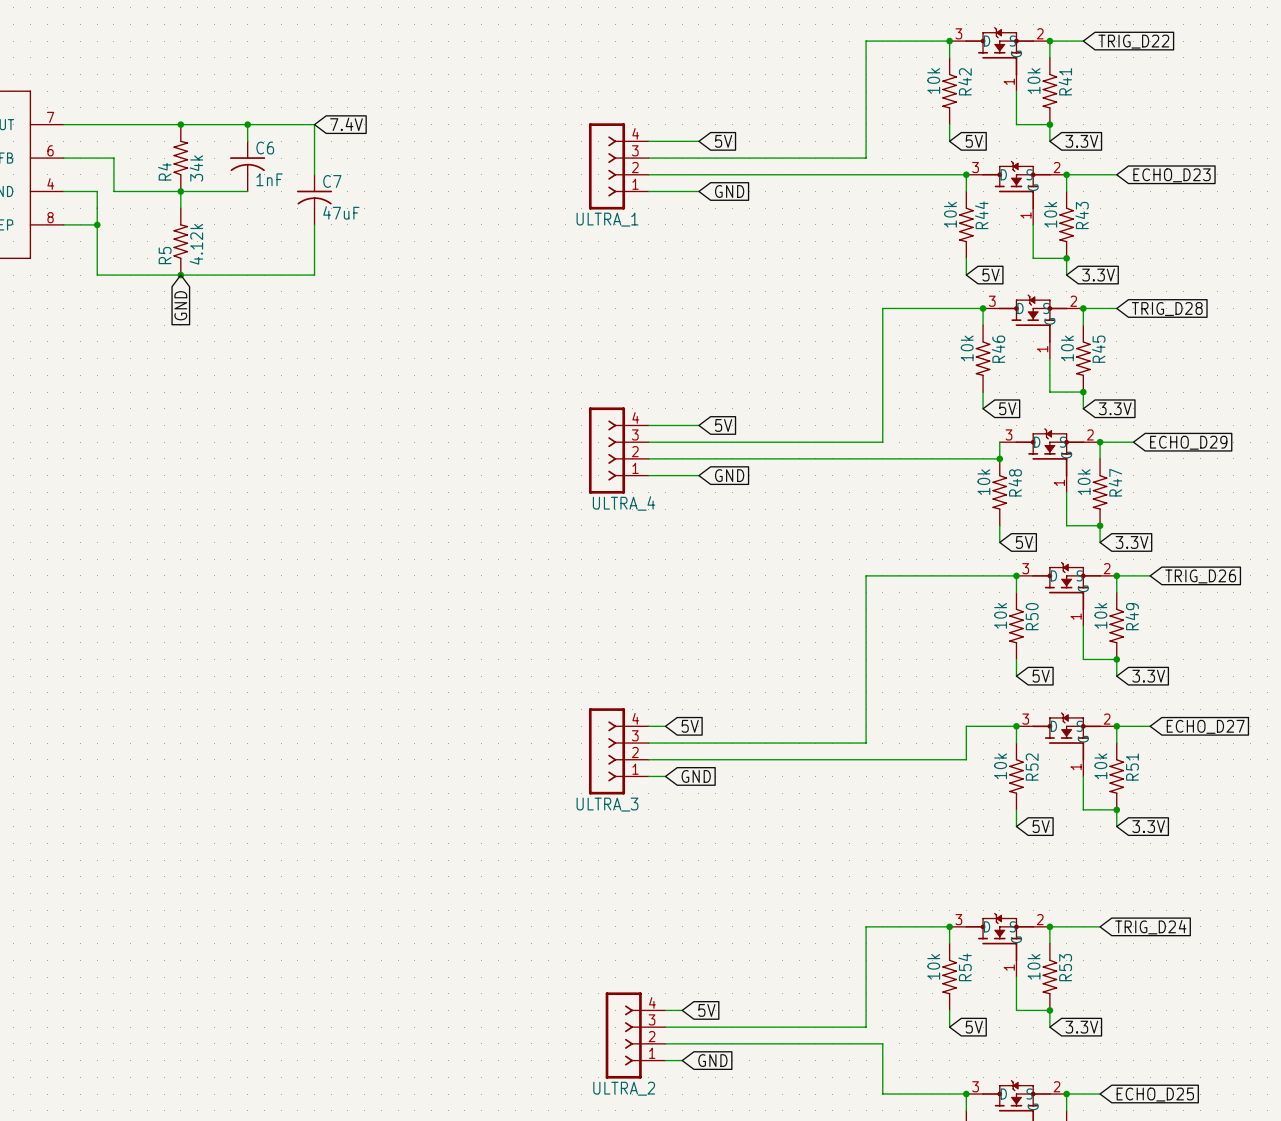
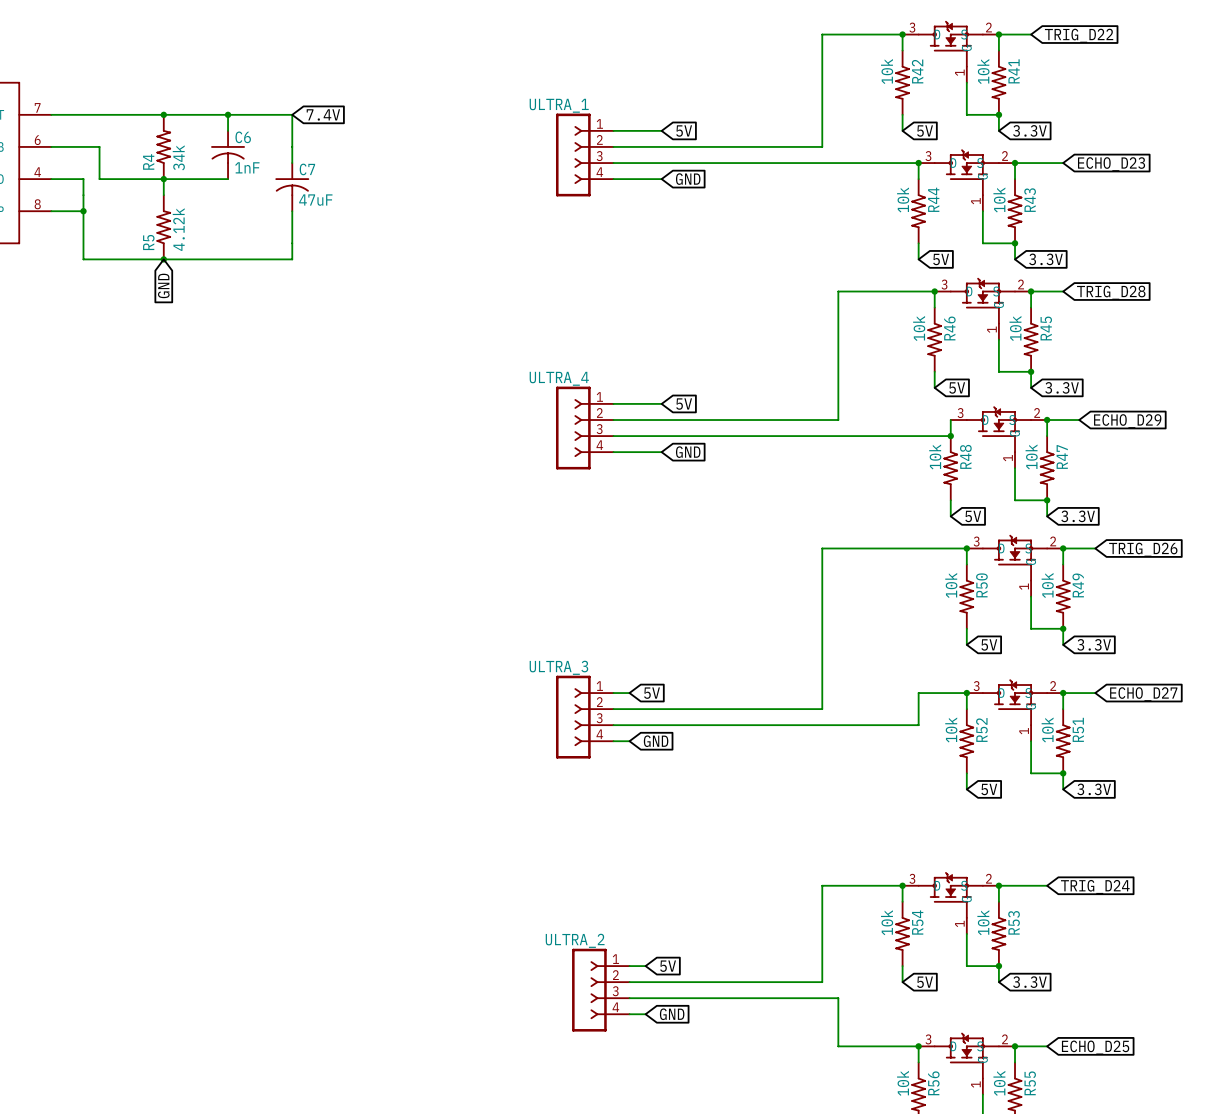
ULTRA_1 flip: as is (607, 166) -> up-down (573, 155)
ULTRA_1 name position: ULTRA_1 (607, 219) -> ULTRA_1 (559, 105)
ULTRA_4 flip: as is (607, 450) -> up-down (573, 428)
ULTRA_4 name position: ULTRA_4 (623, 503) -> ULTRA_4 (559, 378)
ULTRA_3 flip: as is (607, 751) -> up-down (573, 717)
ULTRA_3 name position: ULTRA_3 (607, 804) -> ULTRA_3 (558, 667)
ULTRA_2 flip: as is (623, 1035) -> up-down (589, 990)
ULTRA_2 name position: ULTRA_2 (624, 1088) -> ULTRA_2 (575, 940)

